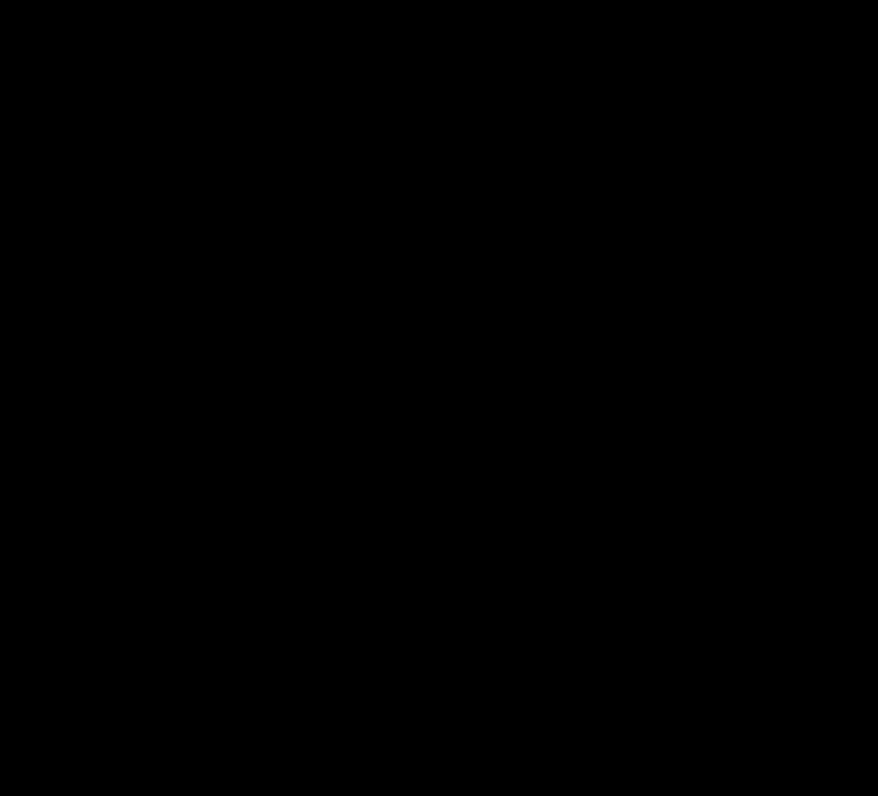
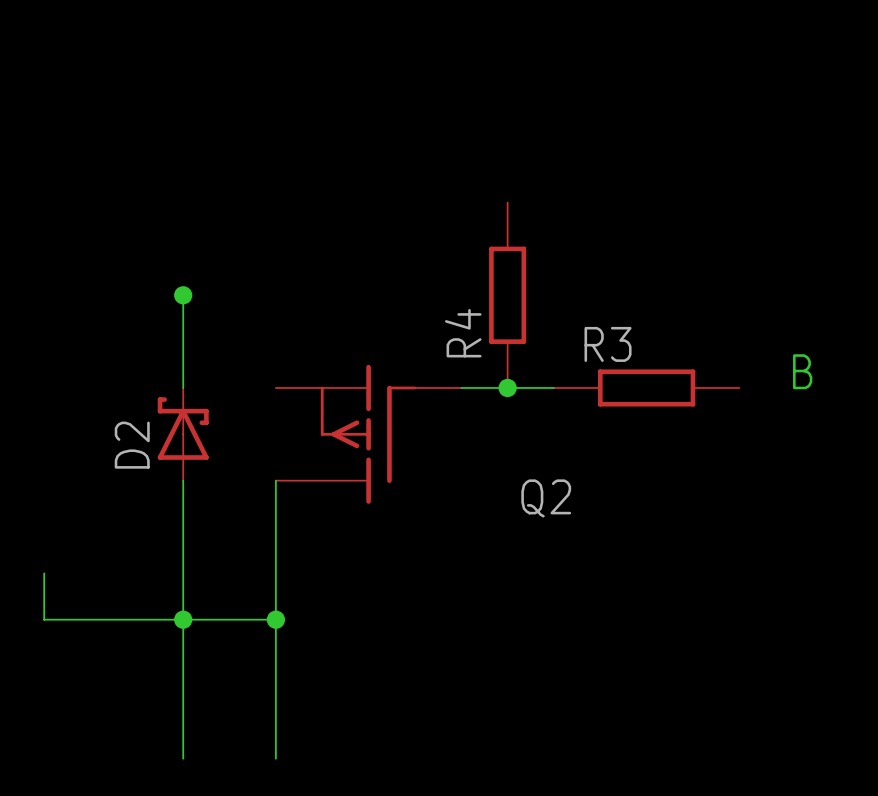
wire: none -> (183, 295) (183, 387)
junction: none -> (183, 295)
R4: none -> (507, 295)
text: none -> B (802, 371)
wire: none -> (461, 387) (553, 387)
junction: none -> (507, 387)
R3: none -> (646, 387)
D2: none -> (183, 434)
Q2: none -> (368, 434)
wire: none -> (183, 480) (183, 758)
wire: none -> (275, 480) (275, 758)
wire: none -> (44, 573) (44, 619) (275, 619)
junction: none -> (183, 619)
junction: none -> (275, 619)

